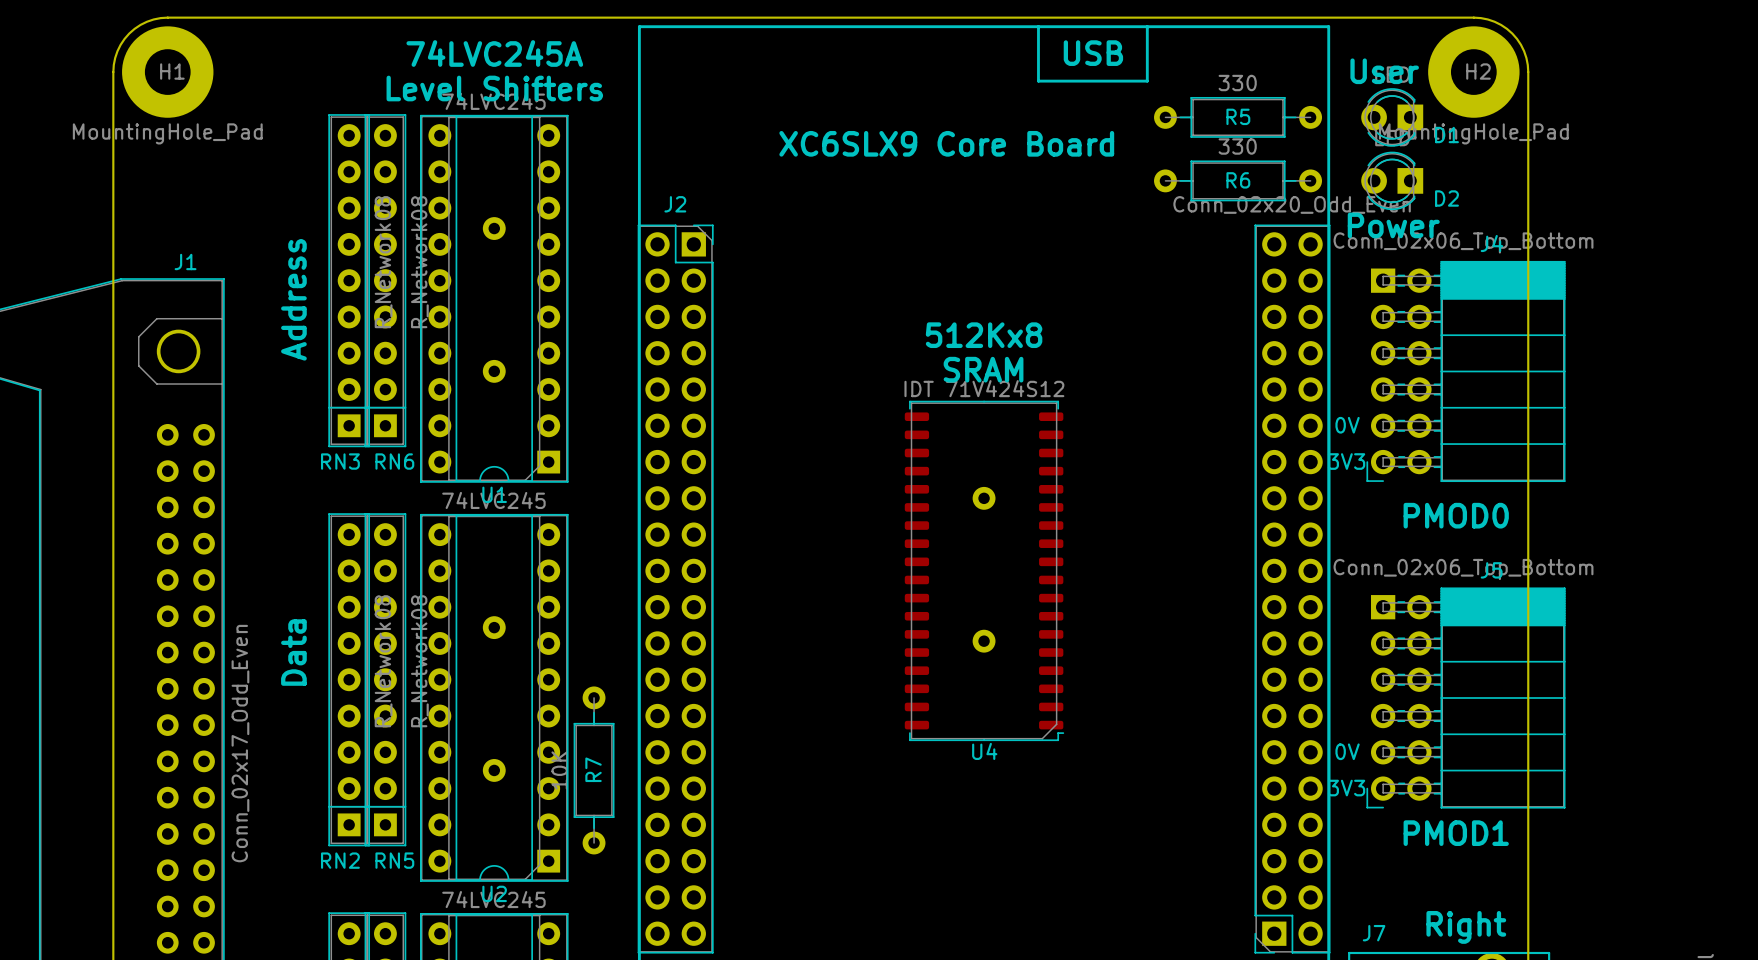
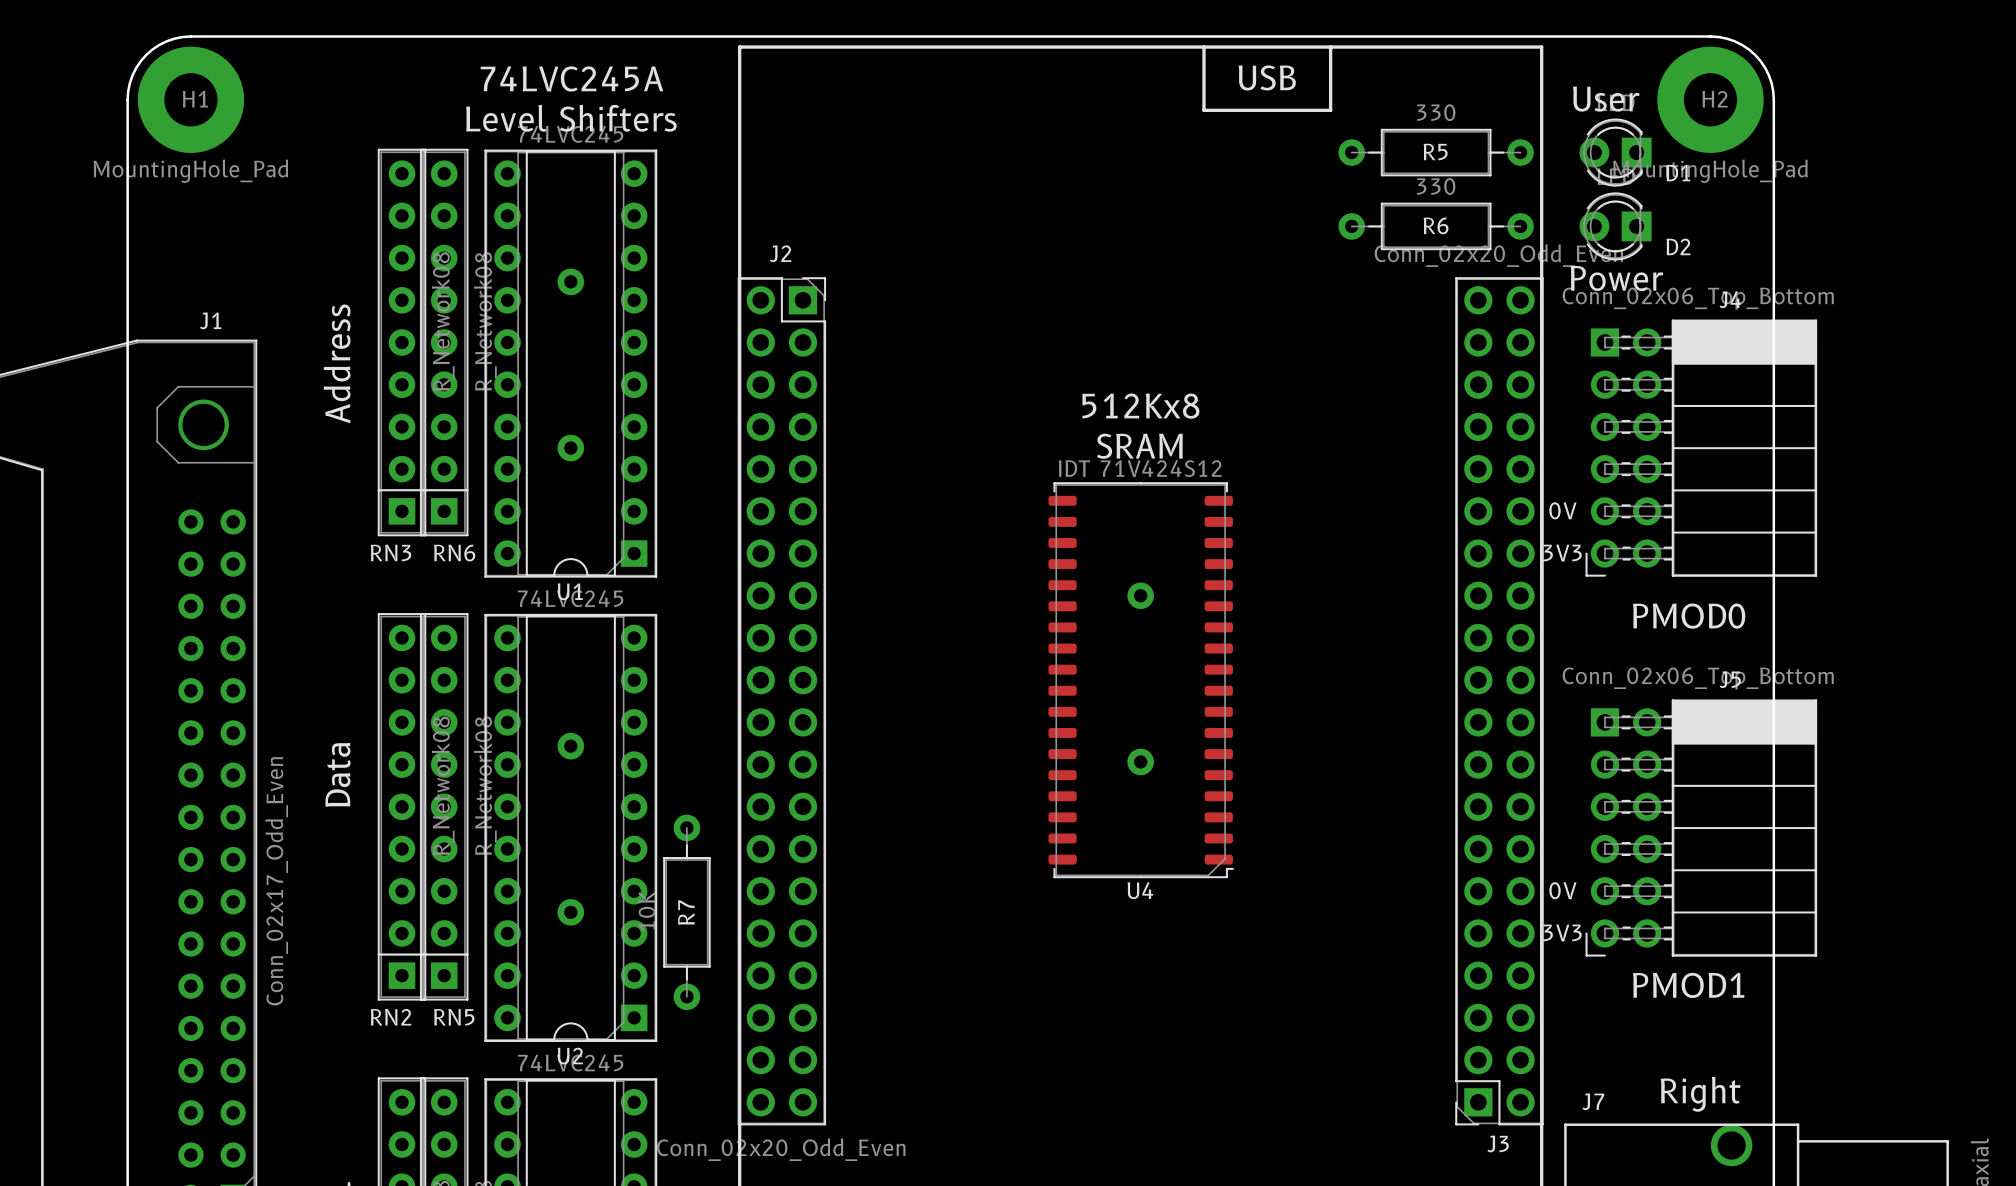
text: XC6SLX9 Core Board (946, 143) -> none

